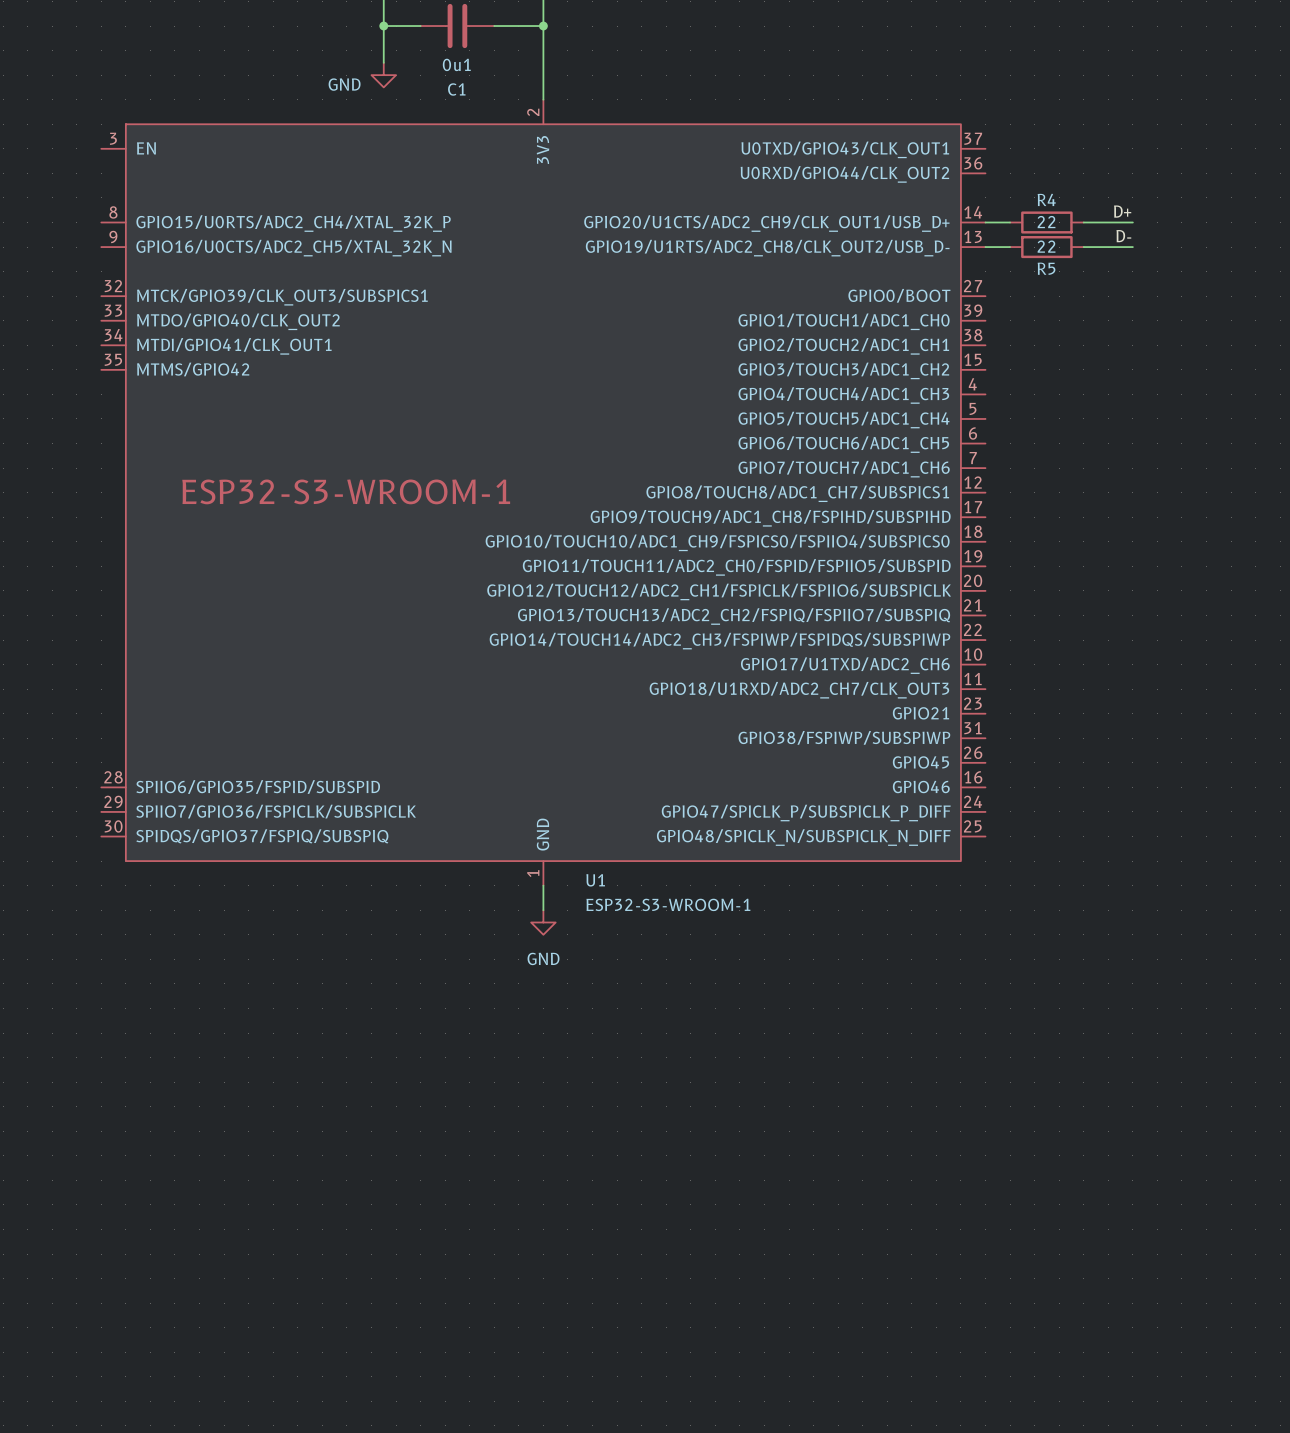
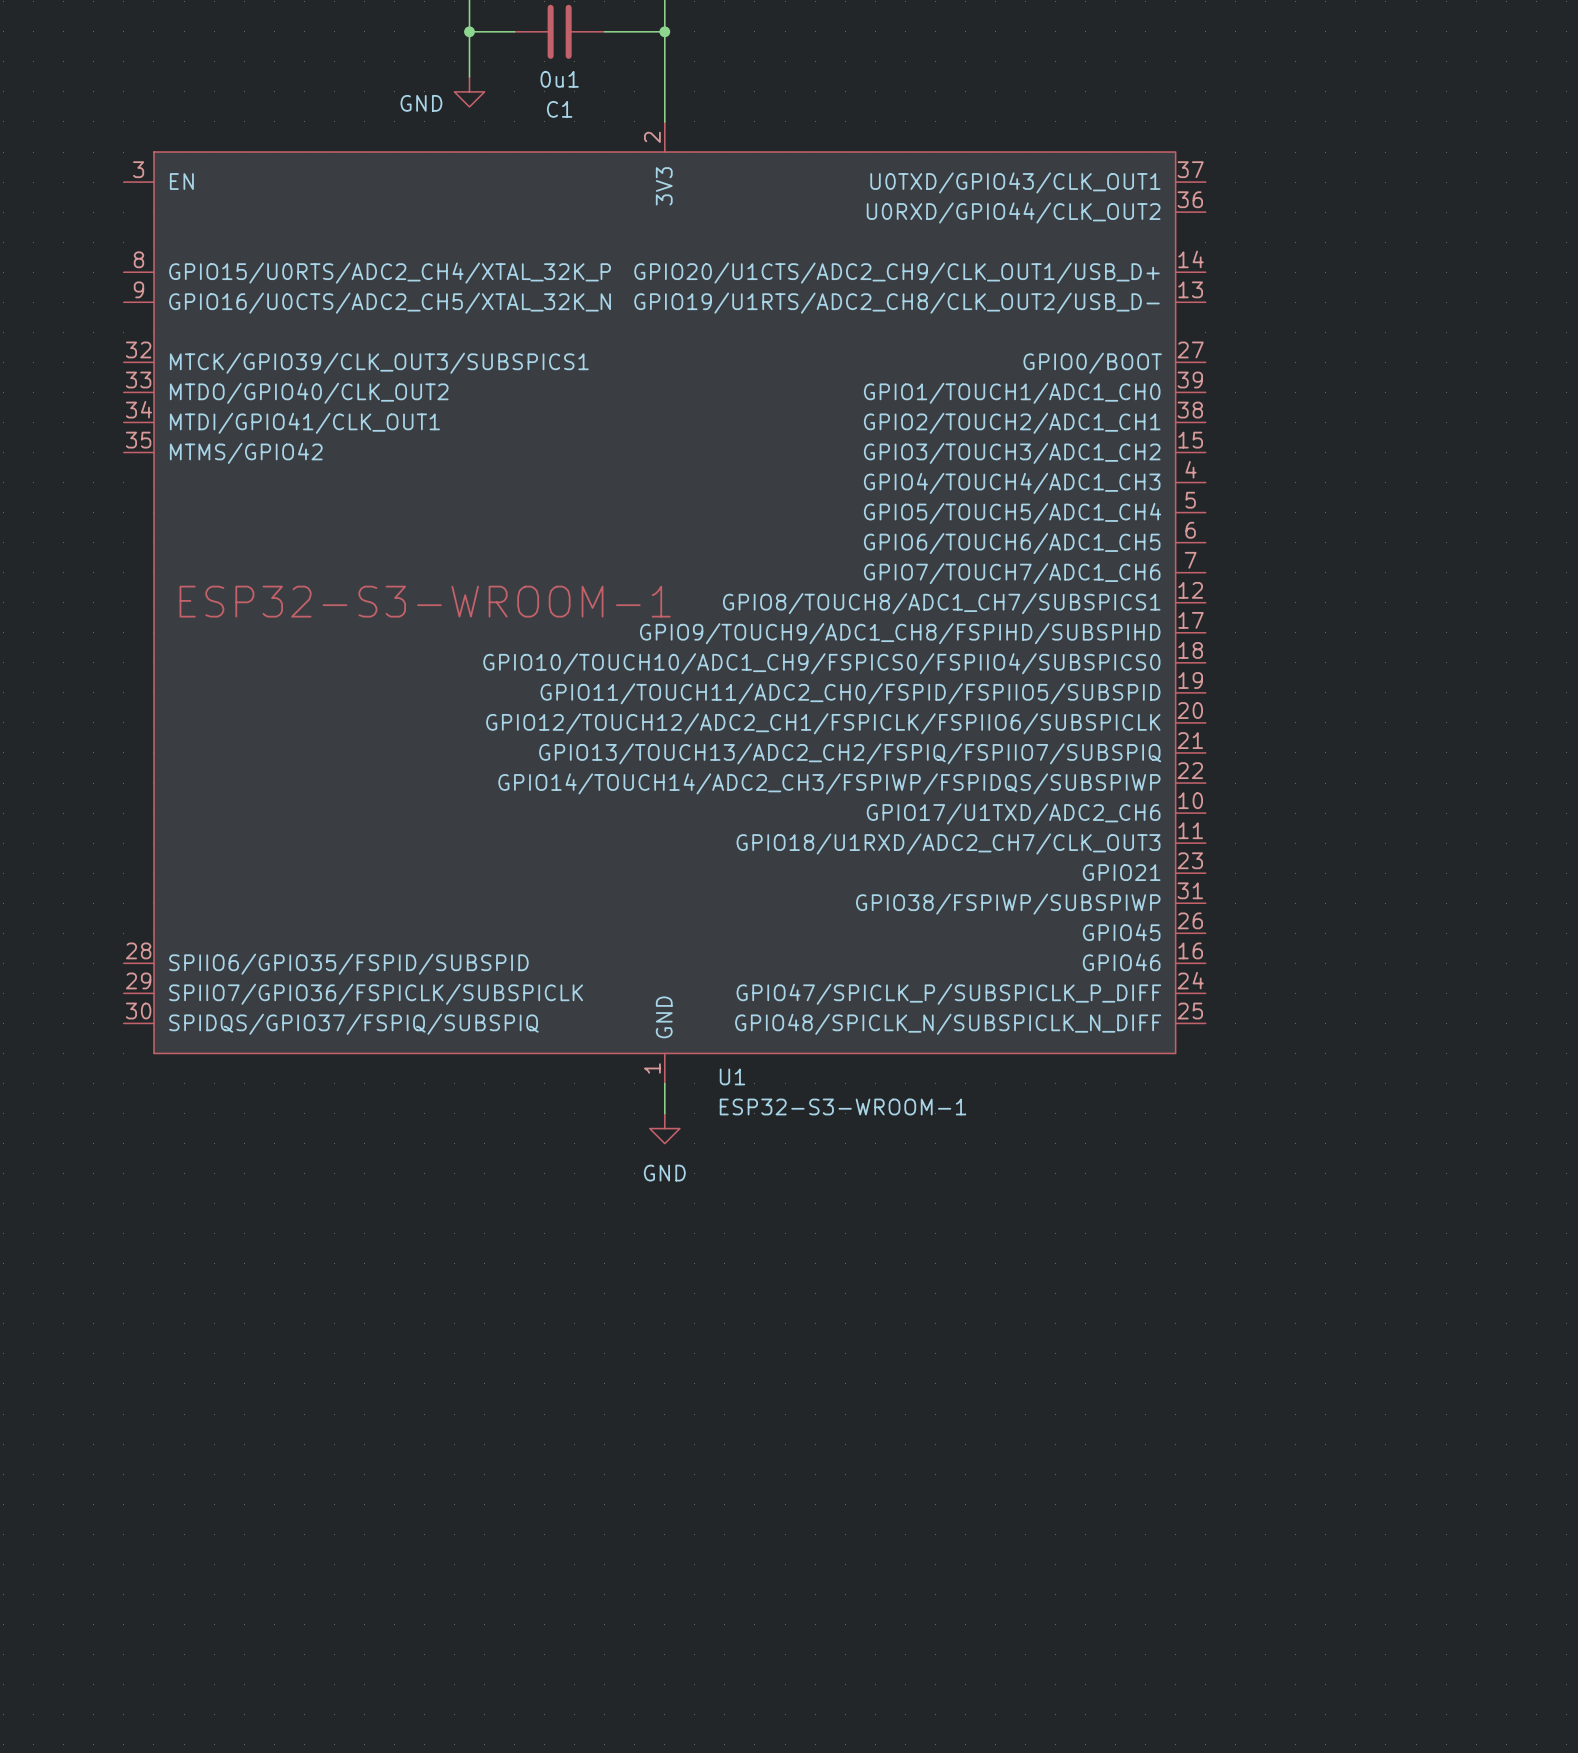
label: D+ (1122, 211) -> none
wire: (985, 222) (1010, 222) -> none
R4: 22 (1046, 222) -> none
wire: (1083, 222) (1132, 222) -> none
label: D- (1123, 236) -> none
wire: (985, 247) (1010, 247) -> none
R5: 22 (1046, 247) -> none
wire: (1083, 247) (1132, 247) -> none

